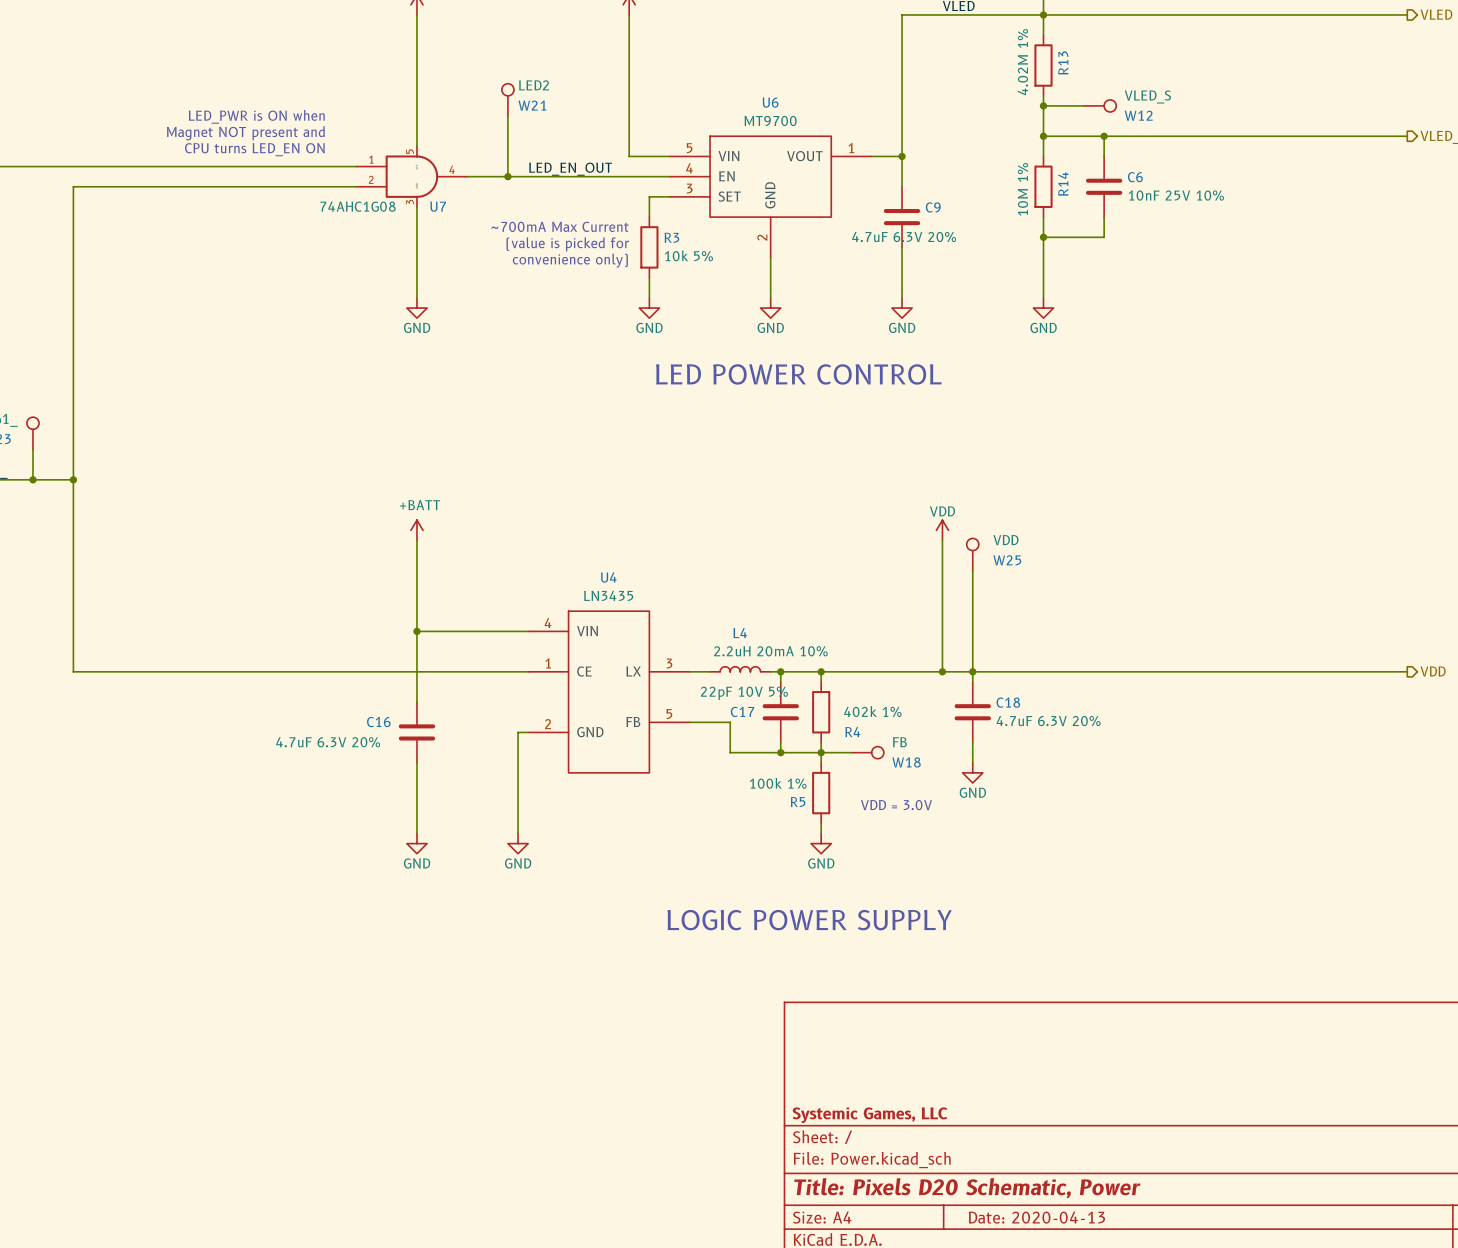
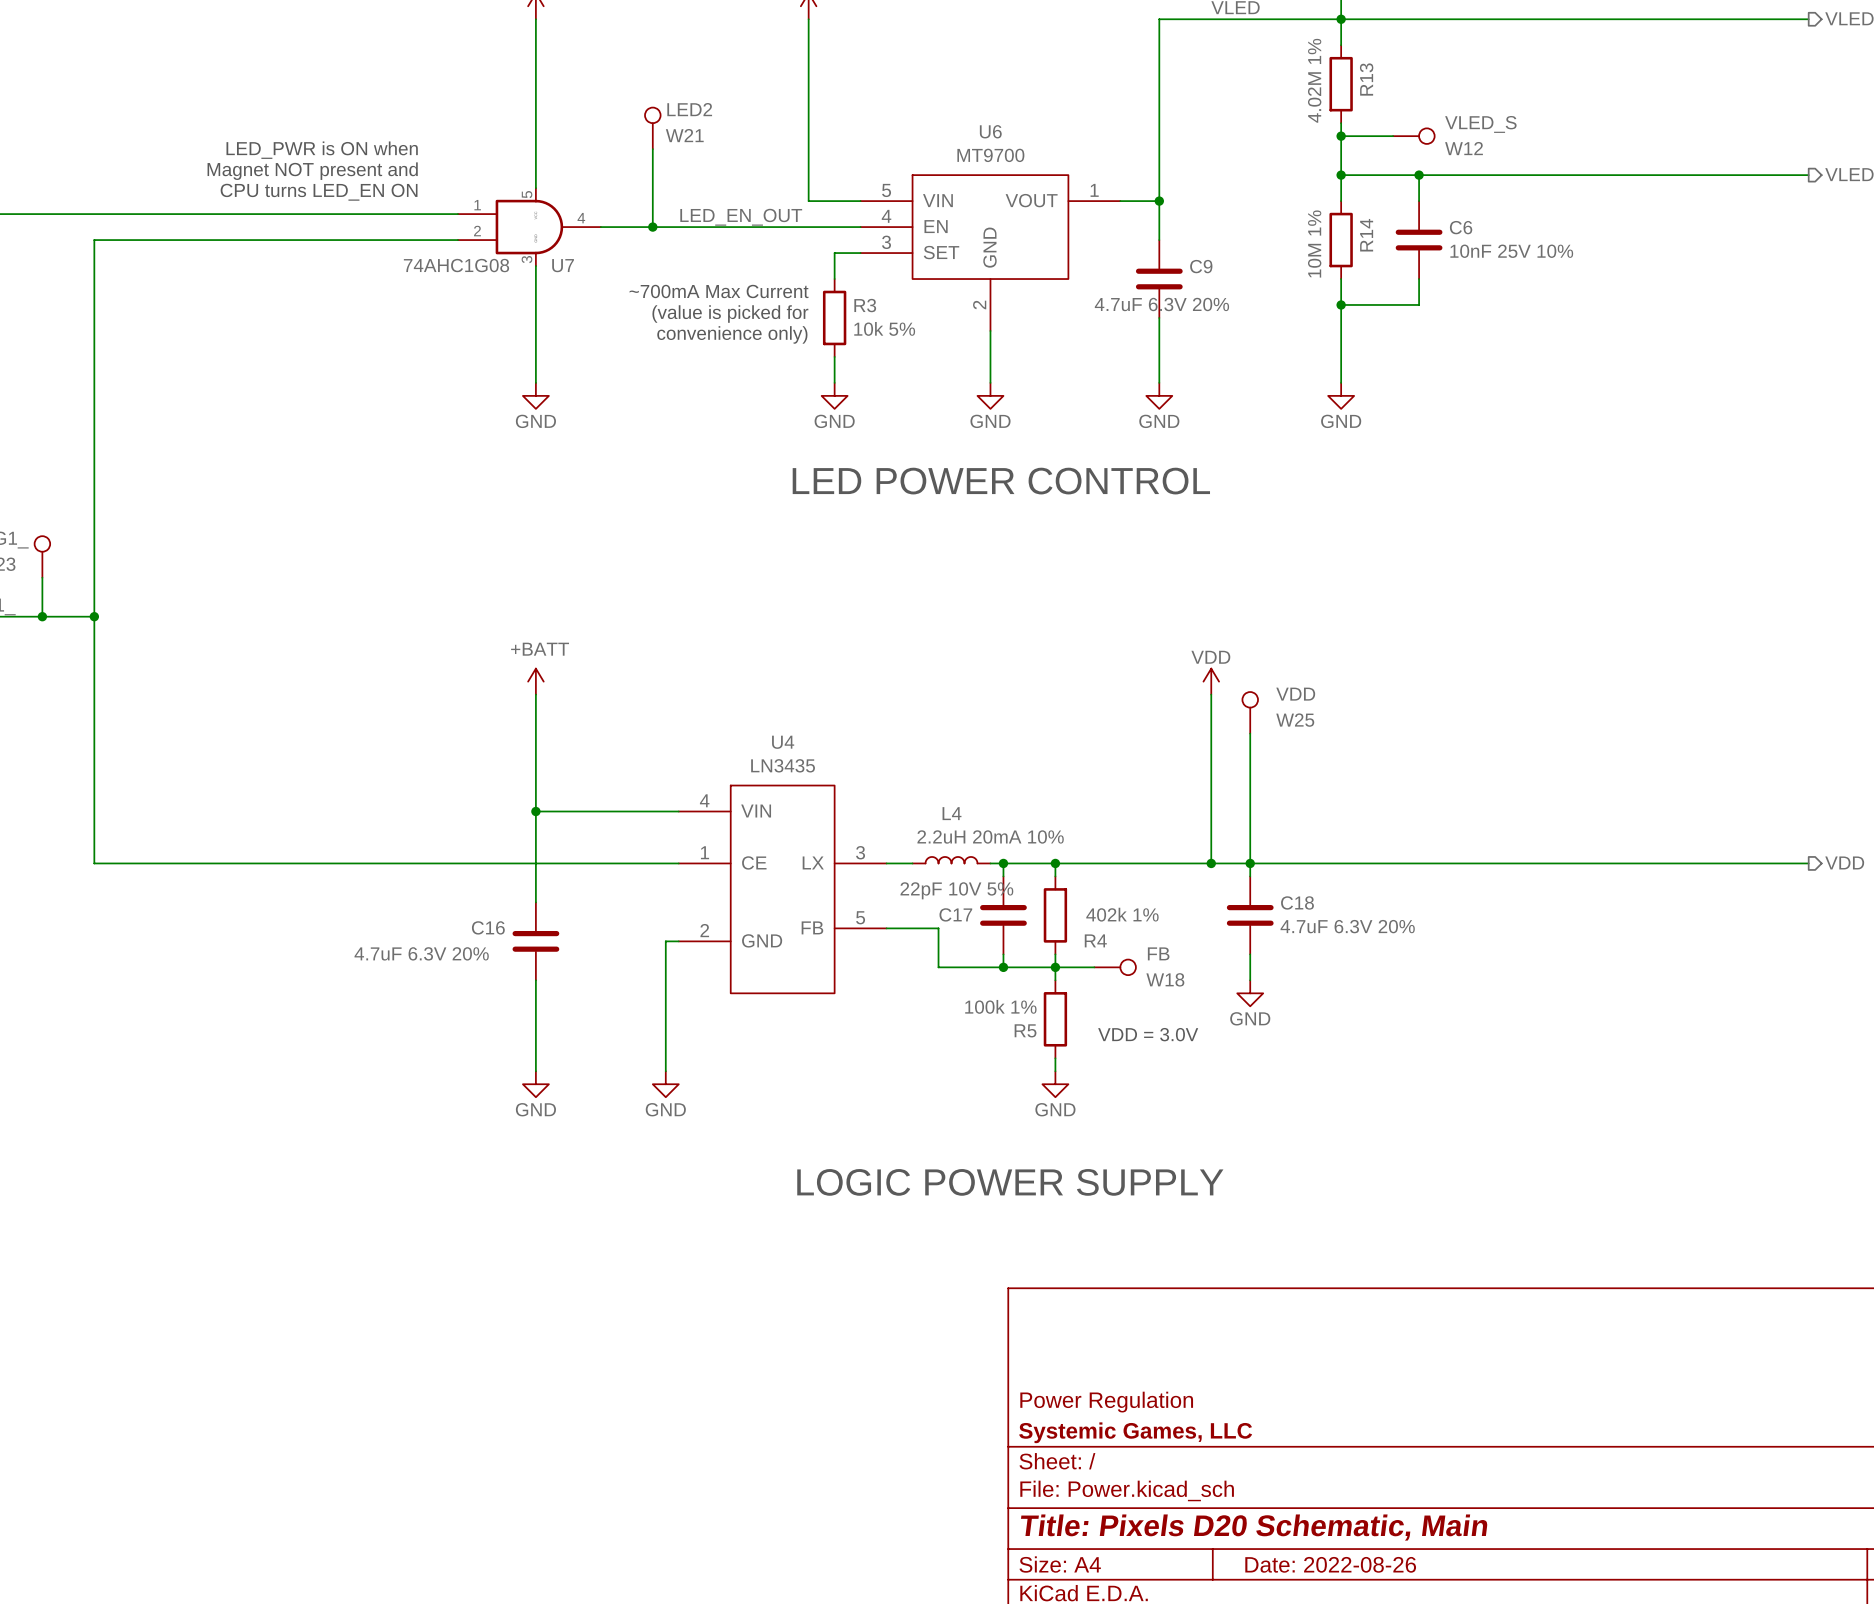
title block: none -> Power Regulation (1106, 1402)
title block: Title: Pixels D20 Schematic, Power (967, 1188) -> Title: Pixels D20 Schematic, Main (1254, 1527)
title block: Date: 2020-04-13 (1036, 1217) -> Date: 2022-08-26 (1330, 1564)

